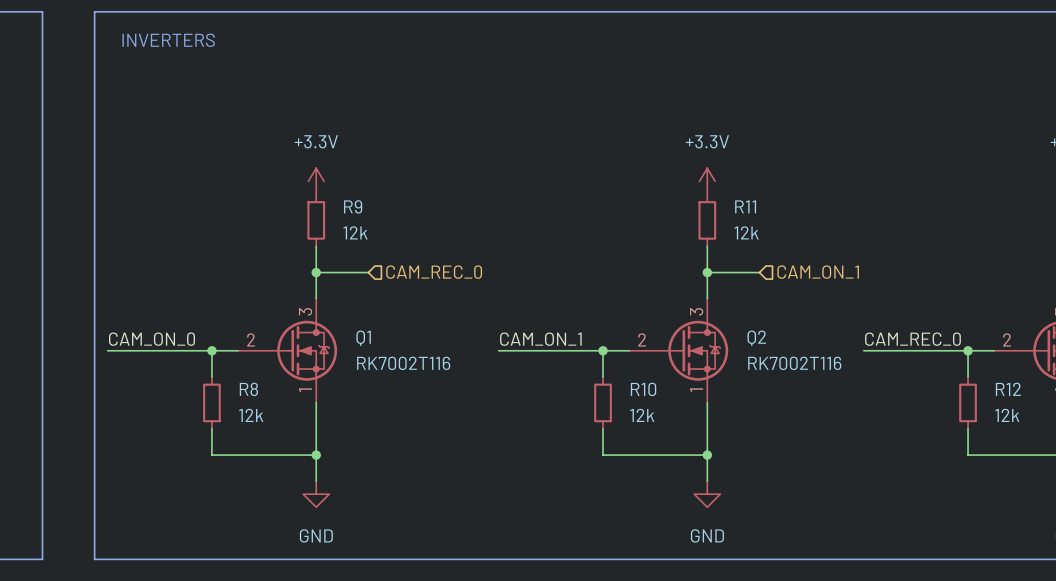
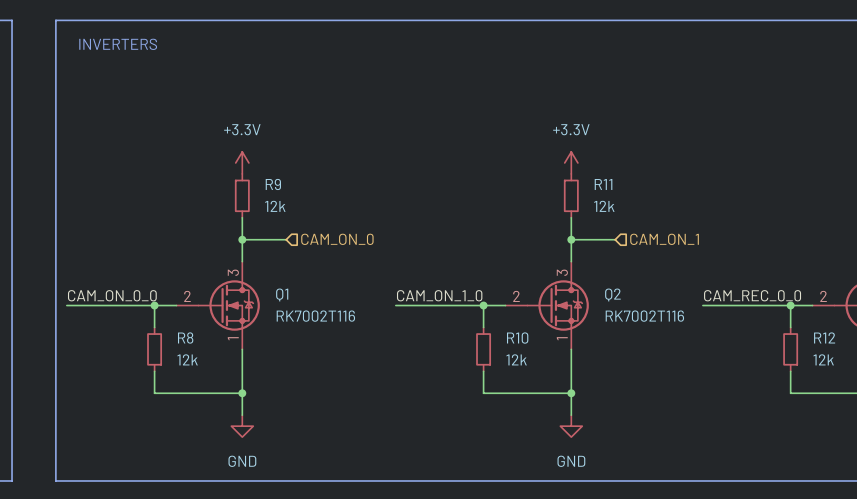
hierarchical label: CAM_REC_0 (434, 272) -> CAM_ON_0 (337, 239)
label: CAM_ON_0 (151, 339) -> CAM_ON_0_0 (112, 295)
label: CAM_ON_1 (540, 339) -> CAM_ON_1_0 (439, 295)
label: CAM_REC_0 (912, 339) -> CAM_REC_0_0 (752, 295)

